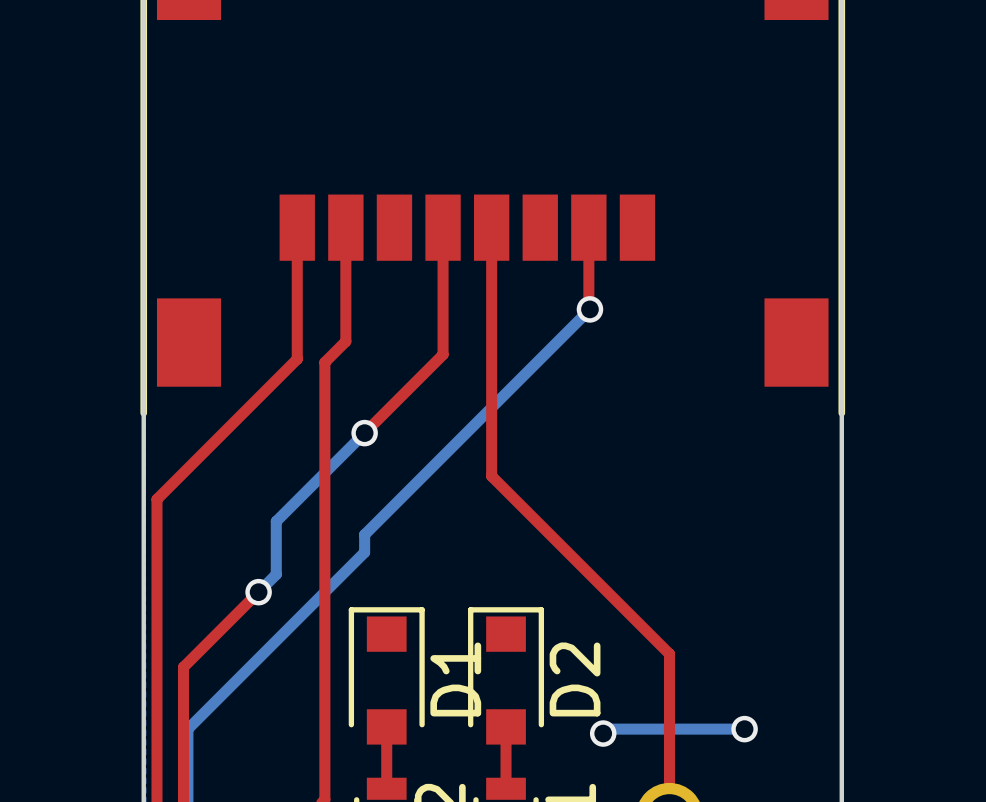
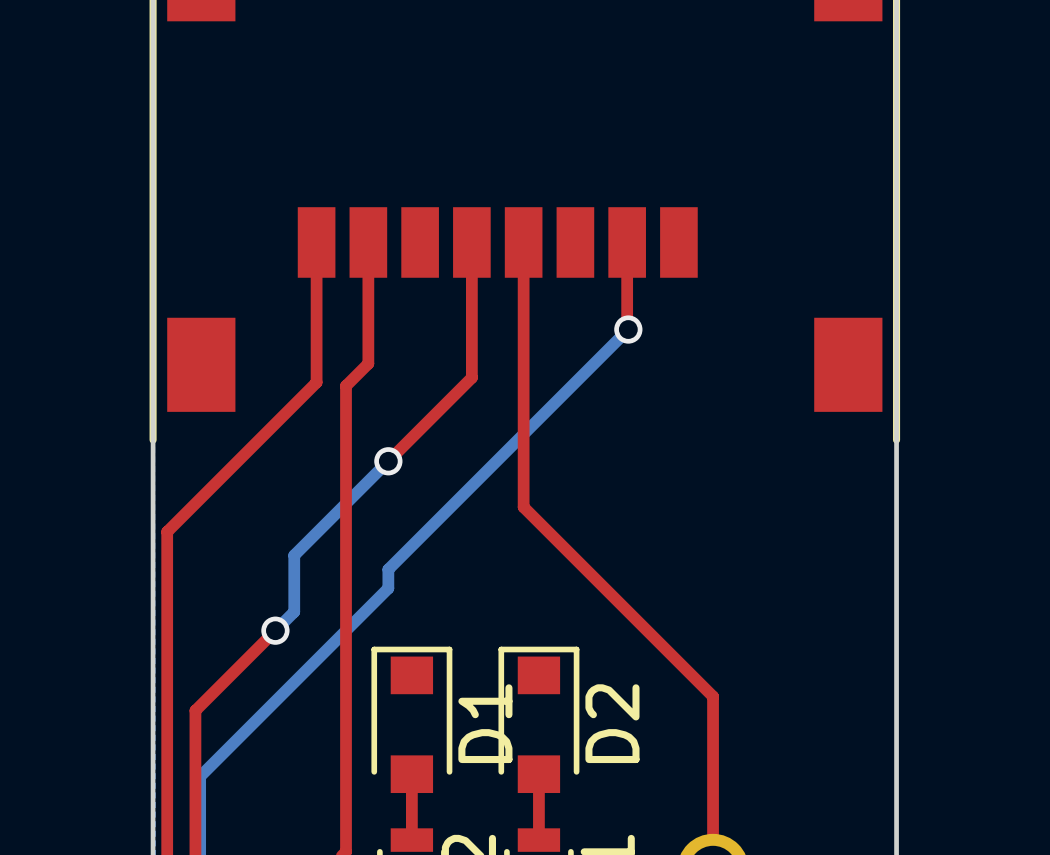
bottom track: (744, 729) (607, 729) (603, 733) -> none
via: (744, 729) -> none
via: (603, 733) -> none

